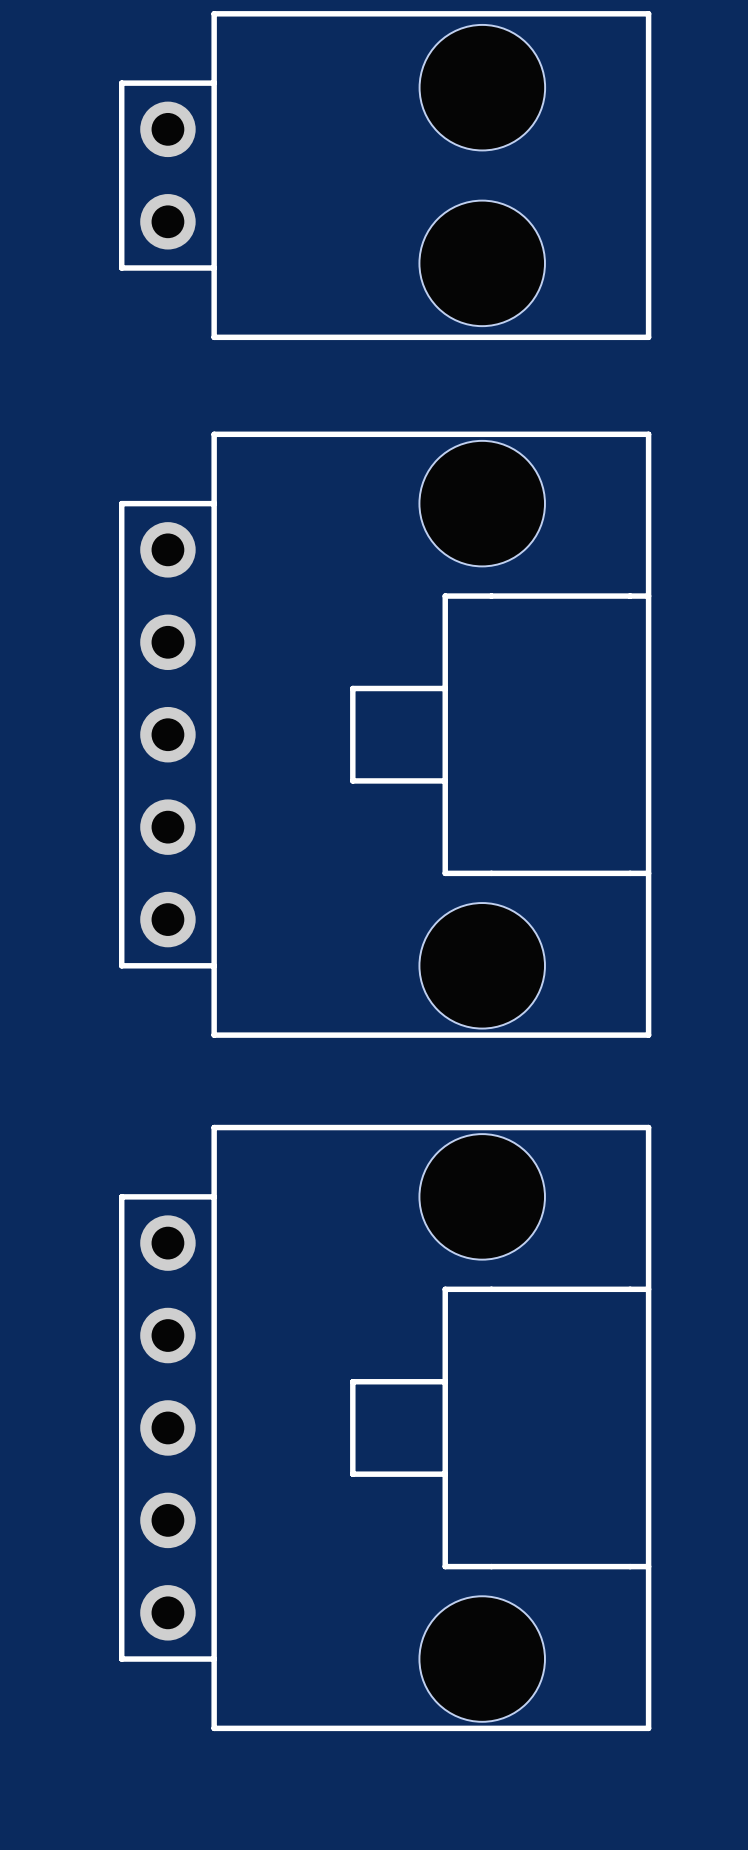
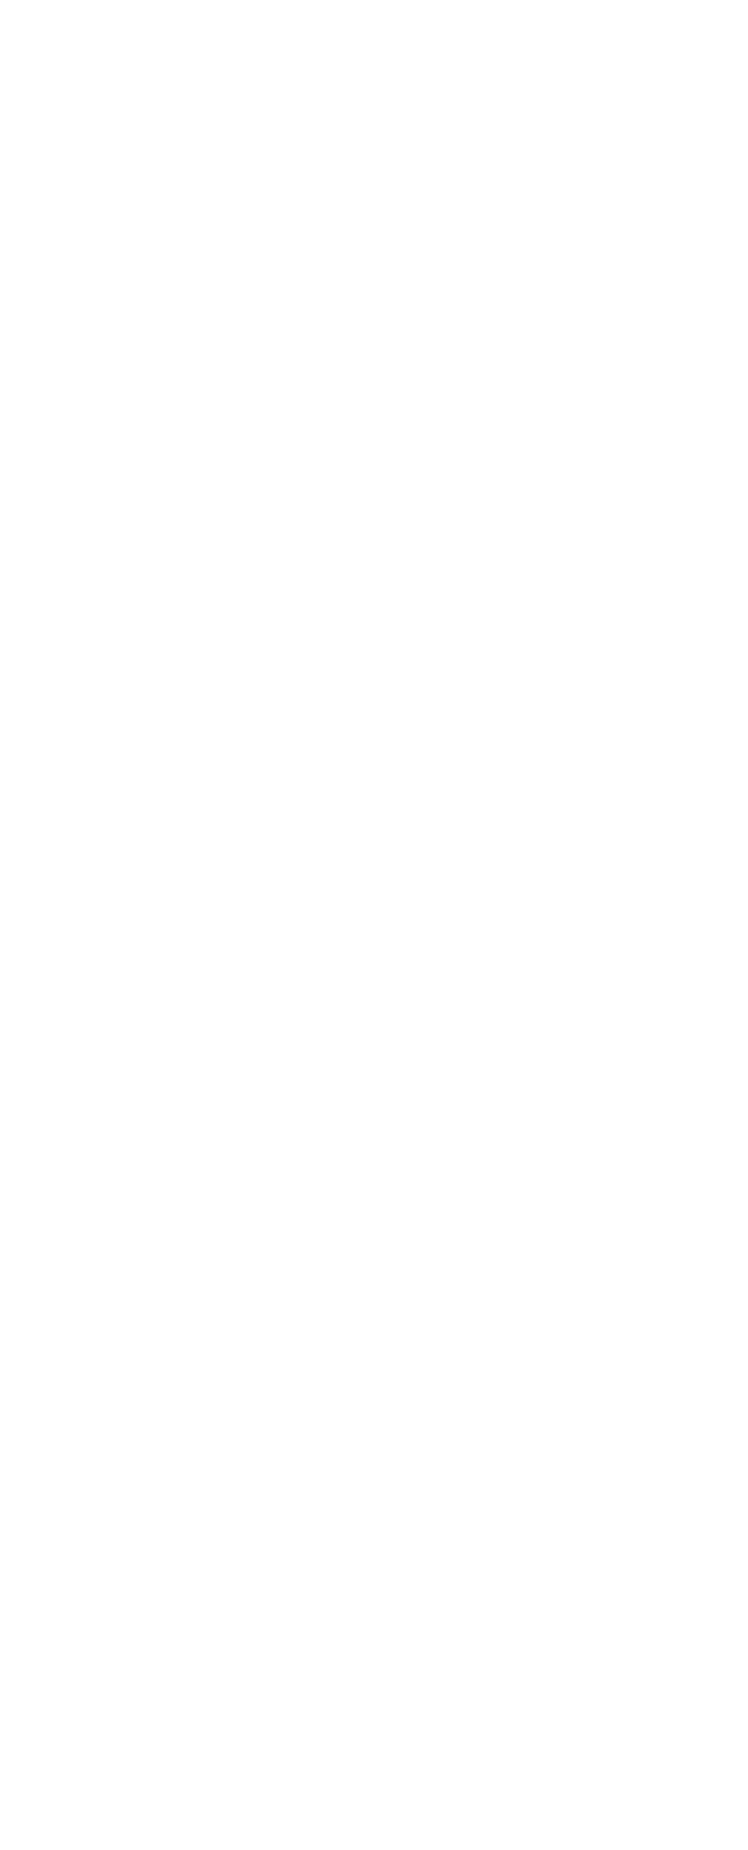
part: (385, 175) -> none
part: (385, 734) -> none
part: (385, 1427) -> none

